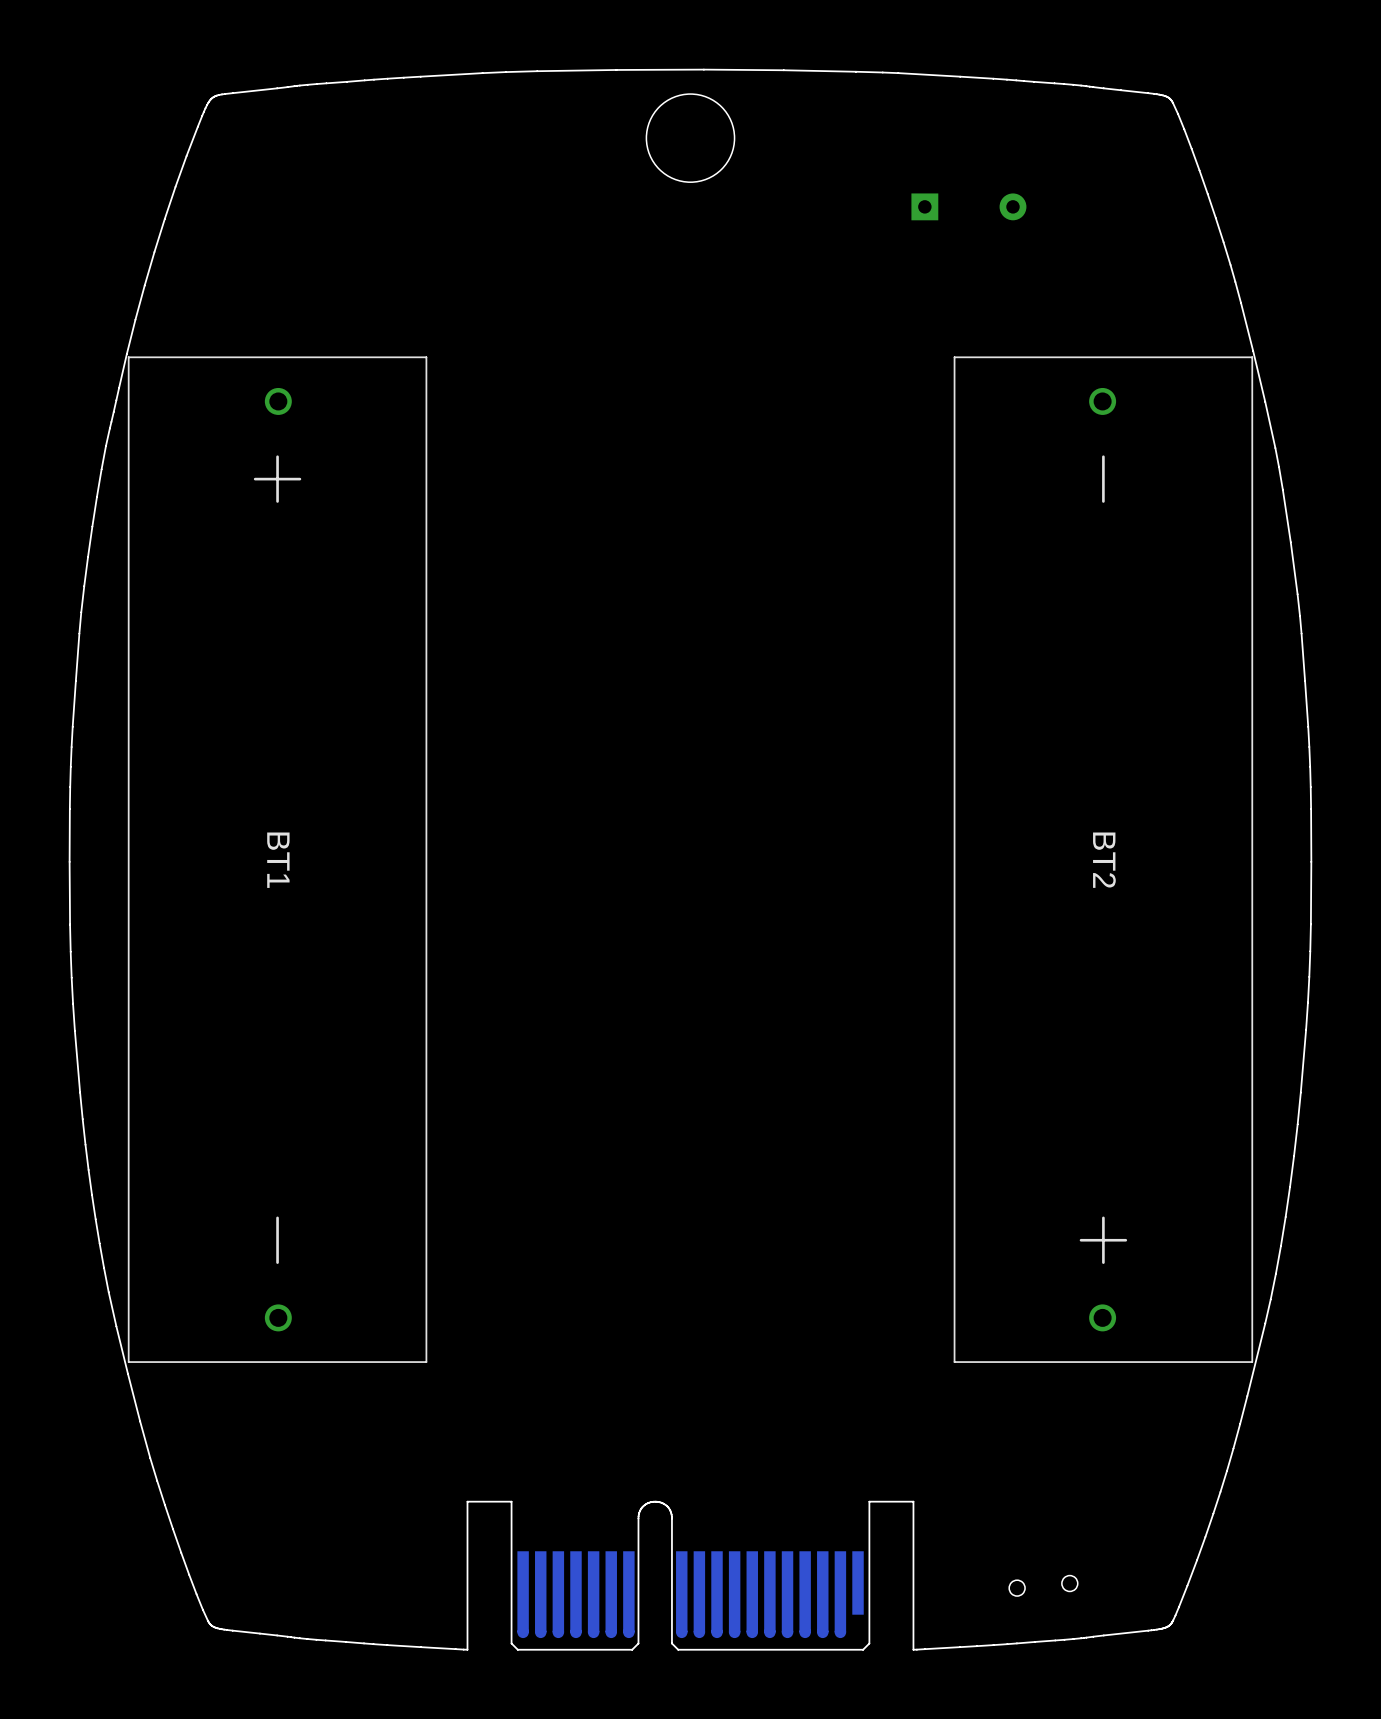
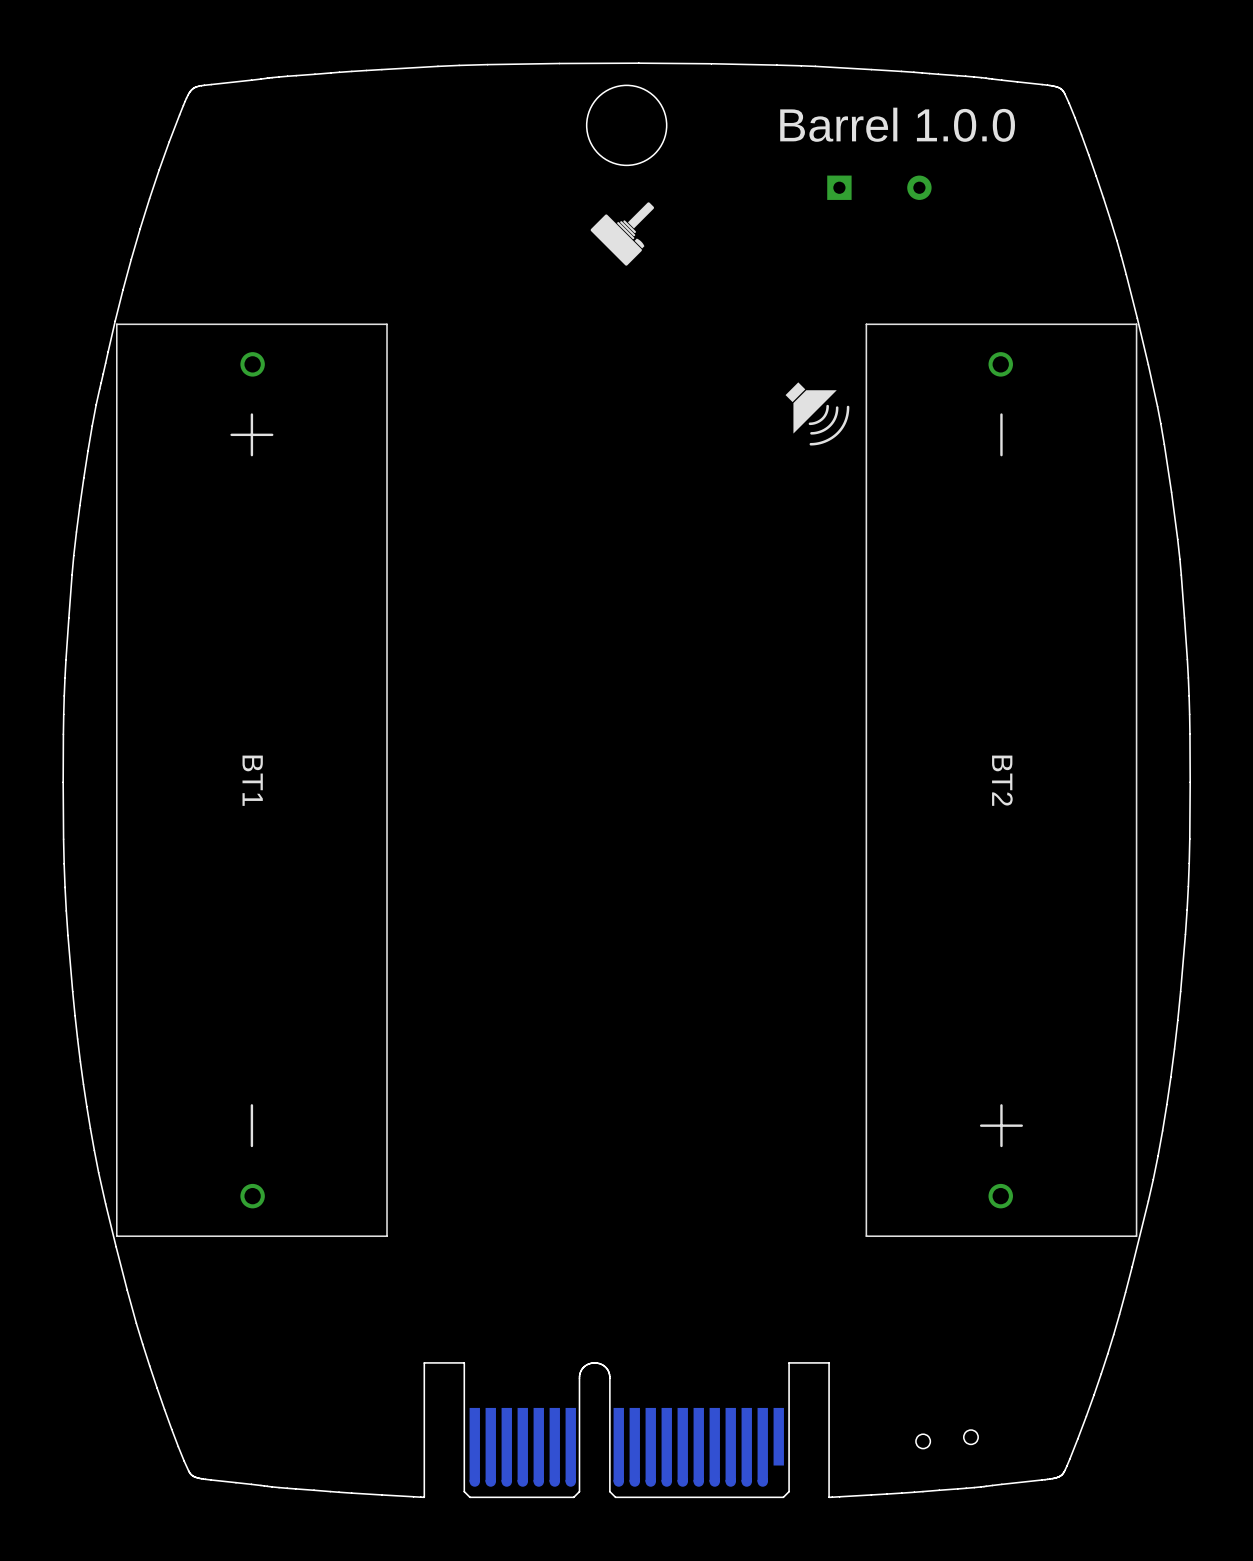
text: none -> Barrel 1.0.0 (897, 124)
drawing: none -> [590, 202, 850, 446]

